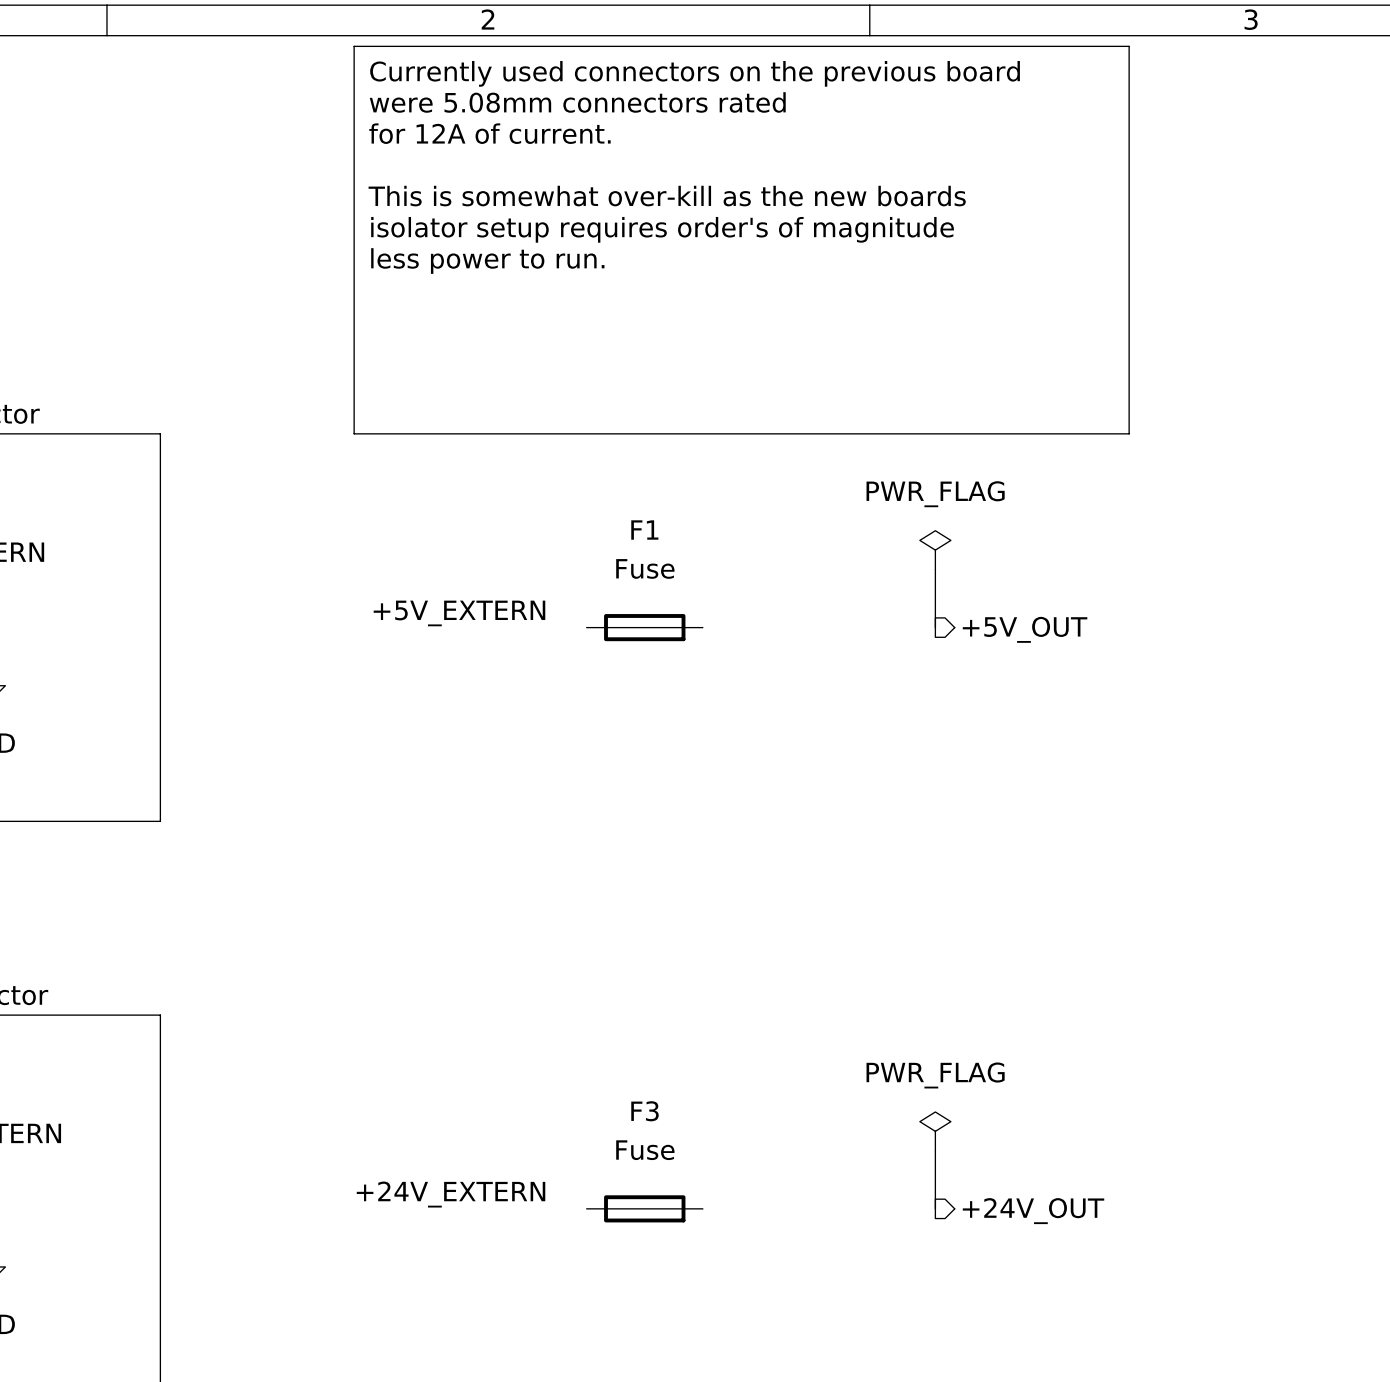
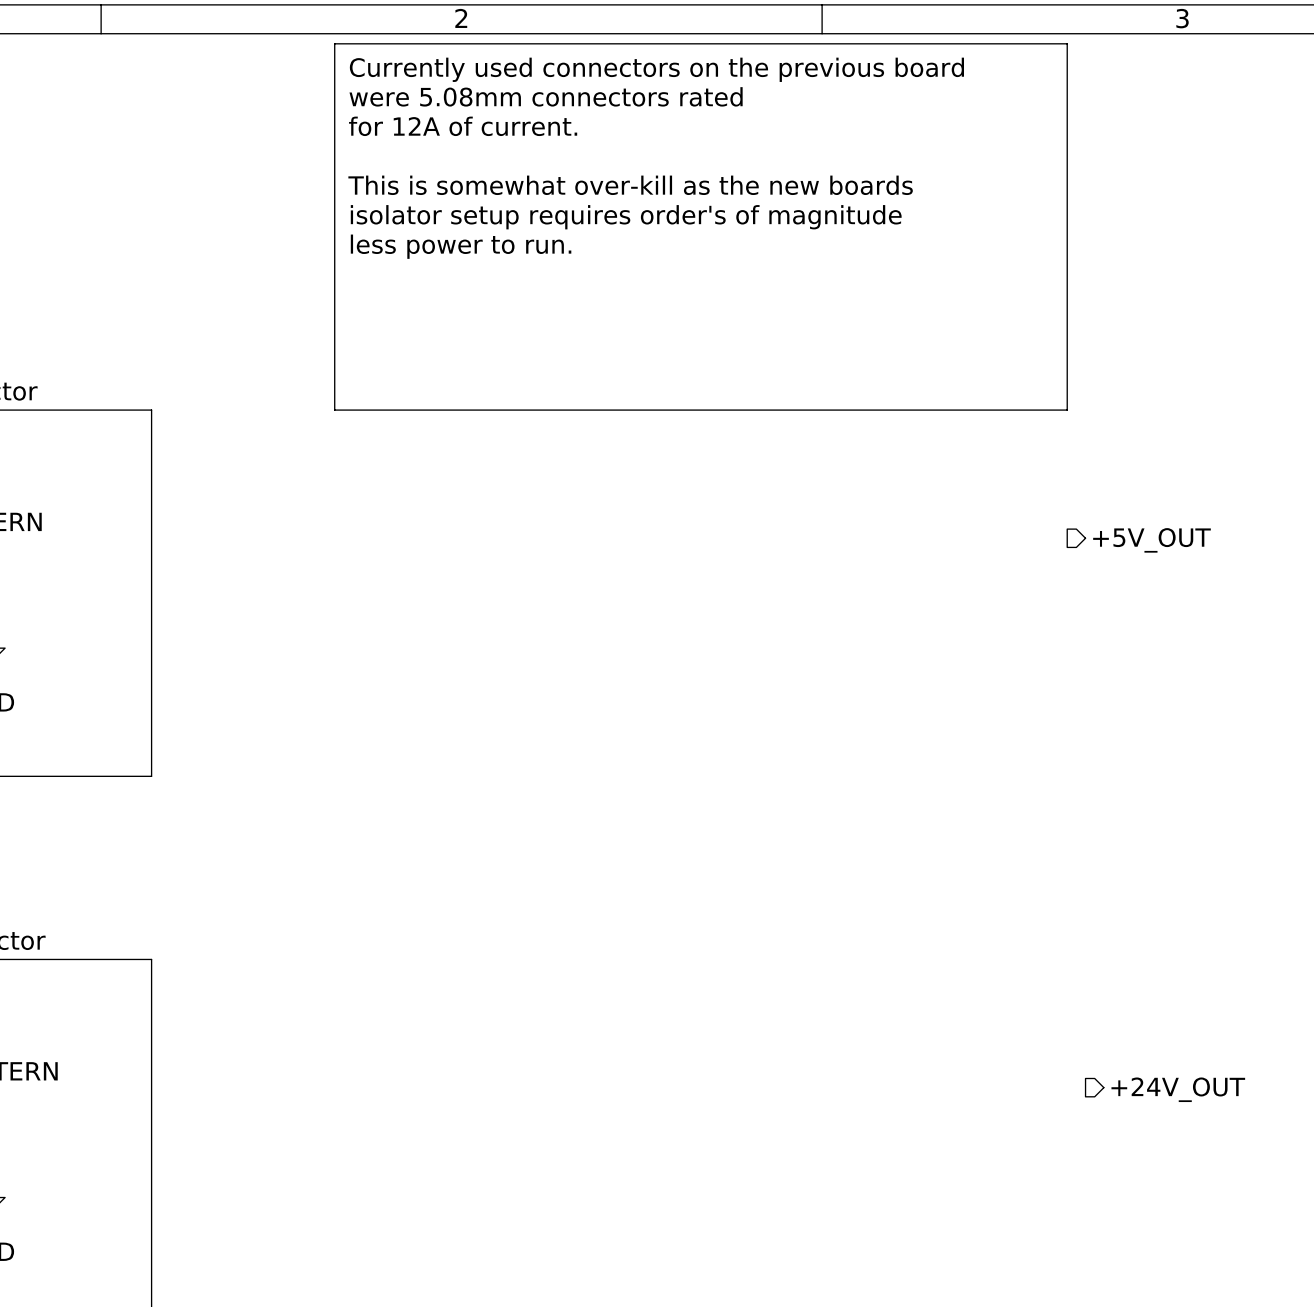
power symbol: PWR_FLAG (935, 550) -> none
wire: (935, 569) (935, 627) -> none
label: +5V_EXTERN (459, 613) -> none
F1: Fuse (644, 627) -> none
hierarchical label position: +5V_OUT (1025, 629) -> +5V_OUT (1151, 540)
power symbol: PWR_FLAG (935, 1131) -> none
wire: (935, 1150) (935, 1208) -> none
label: +24V_EXTERN (451, 1194) -> none
F3: Fuse (644, 1208) -> none
hierarchical label position: +24V_OUT (1033, 1211) -> +24V_OUT (1178, 1089)

